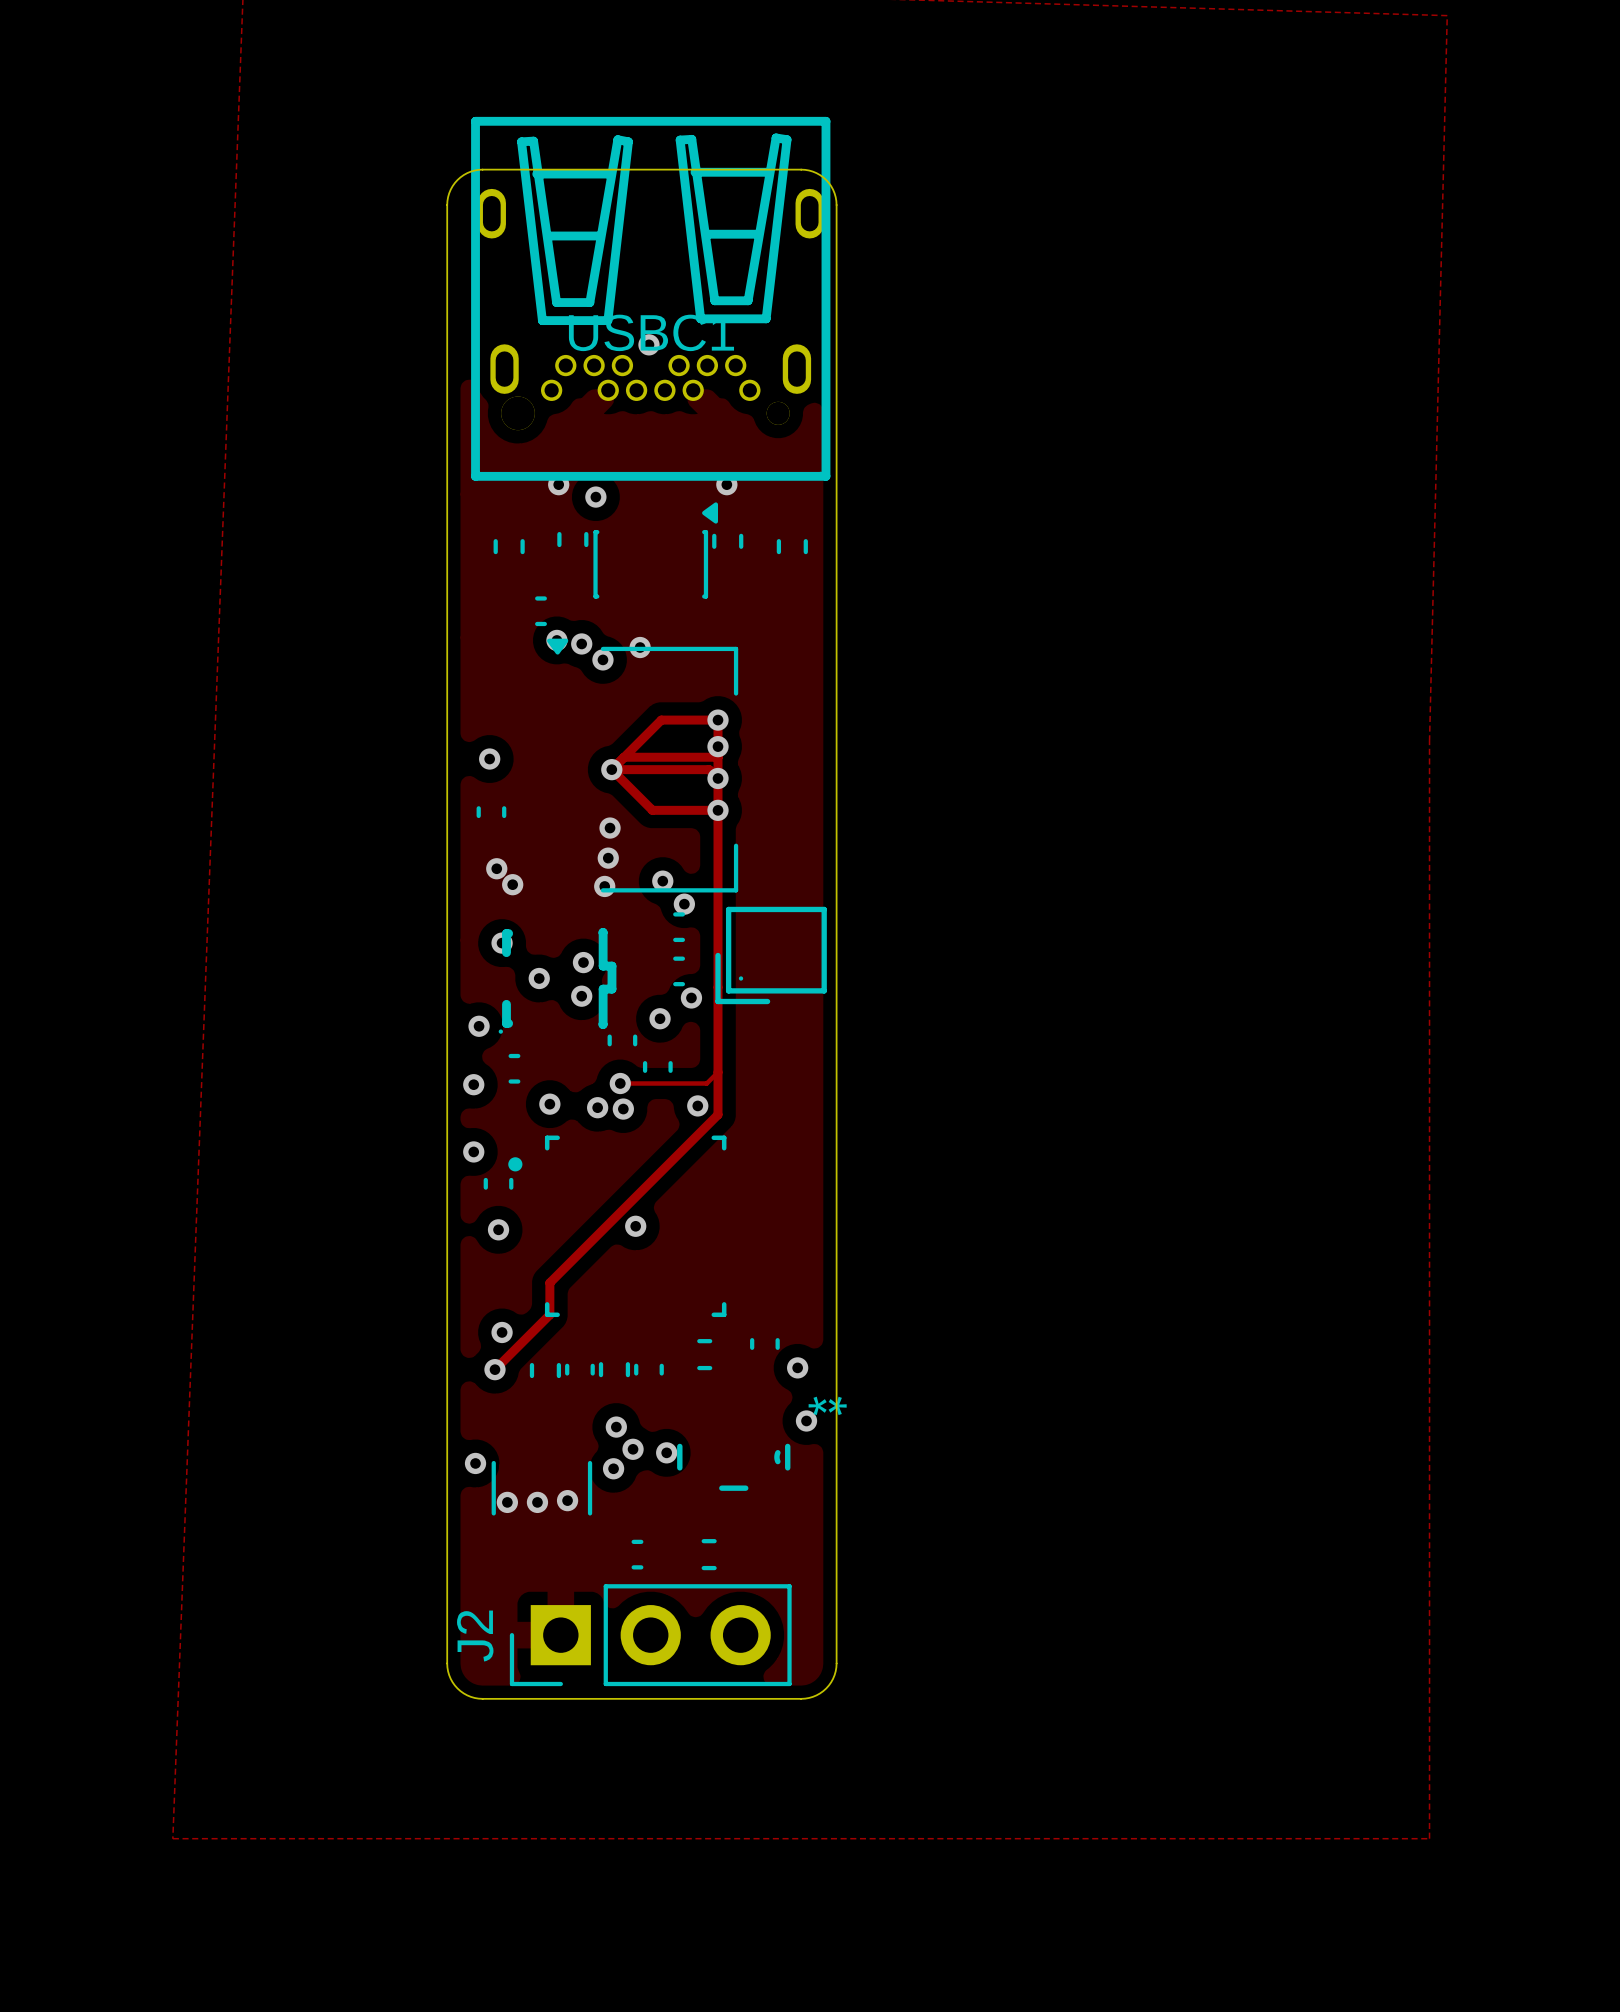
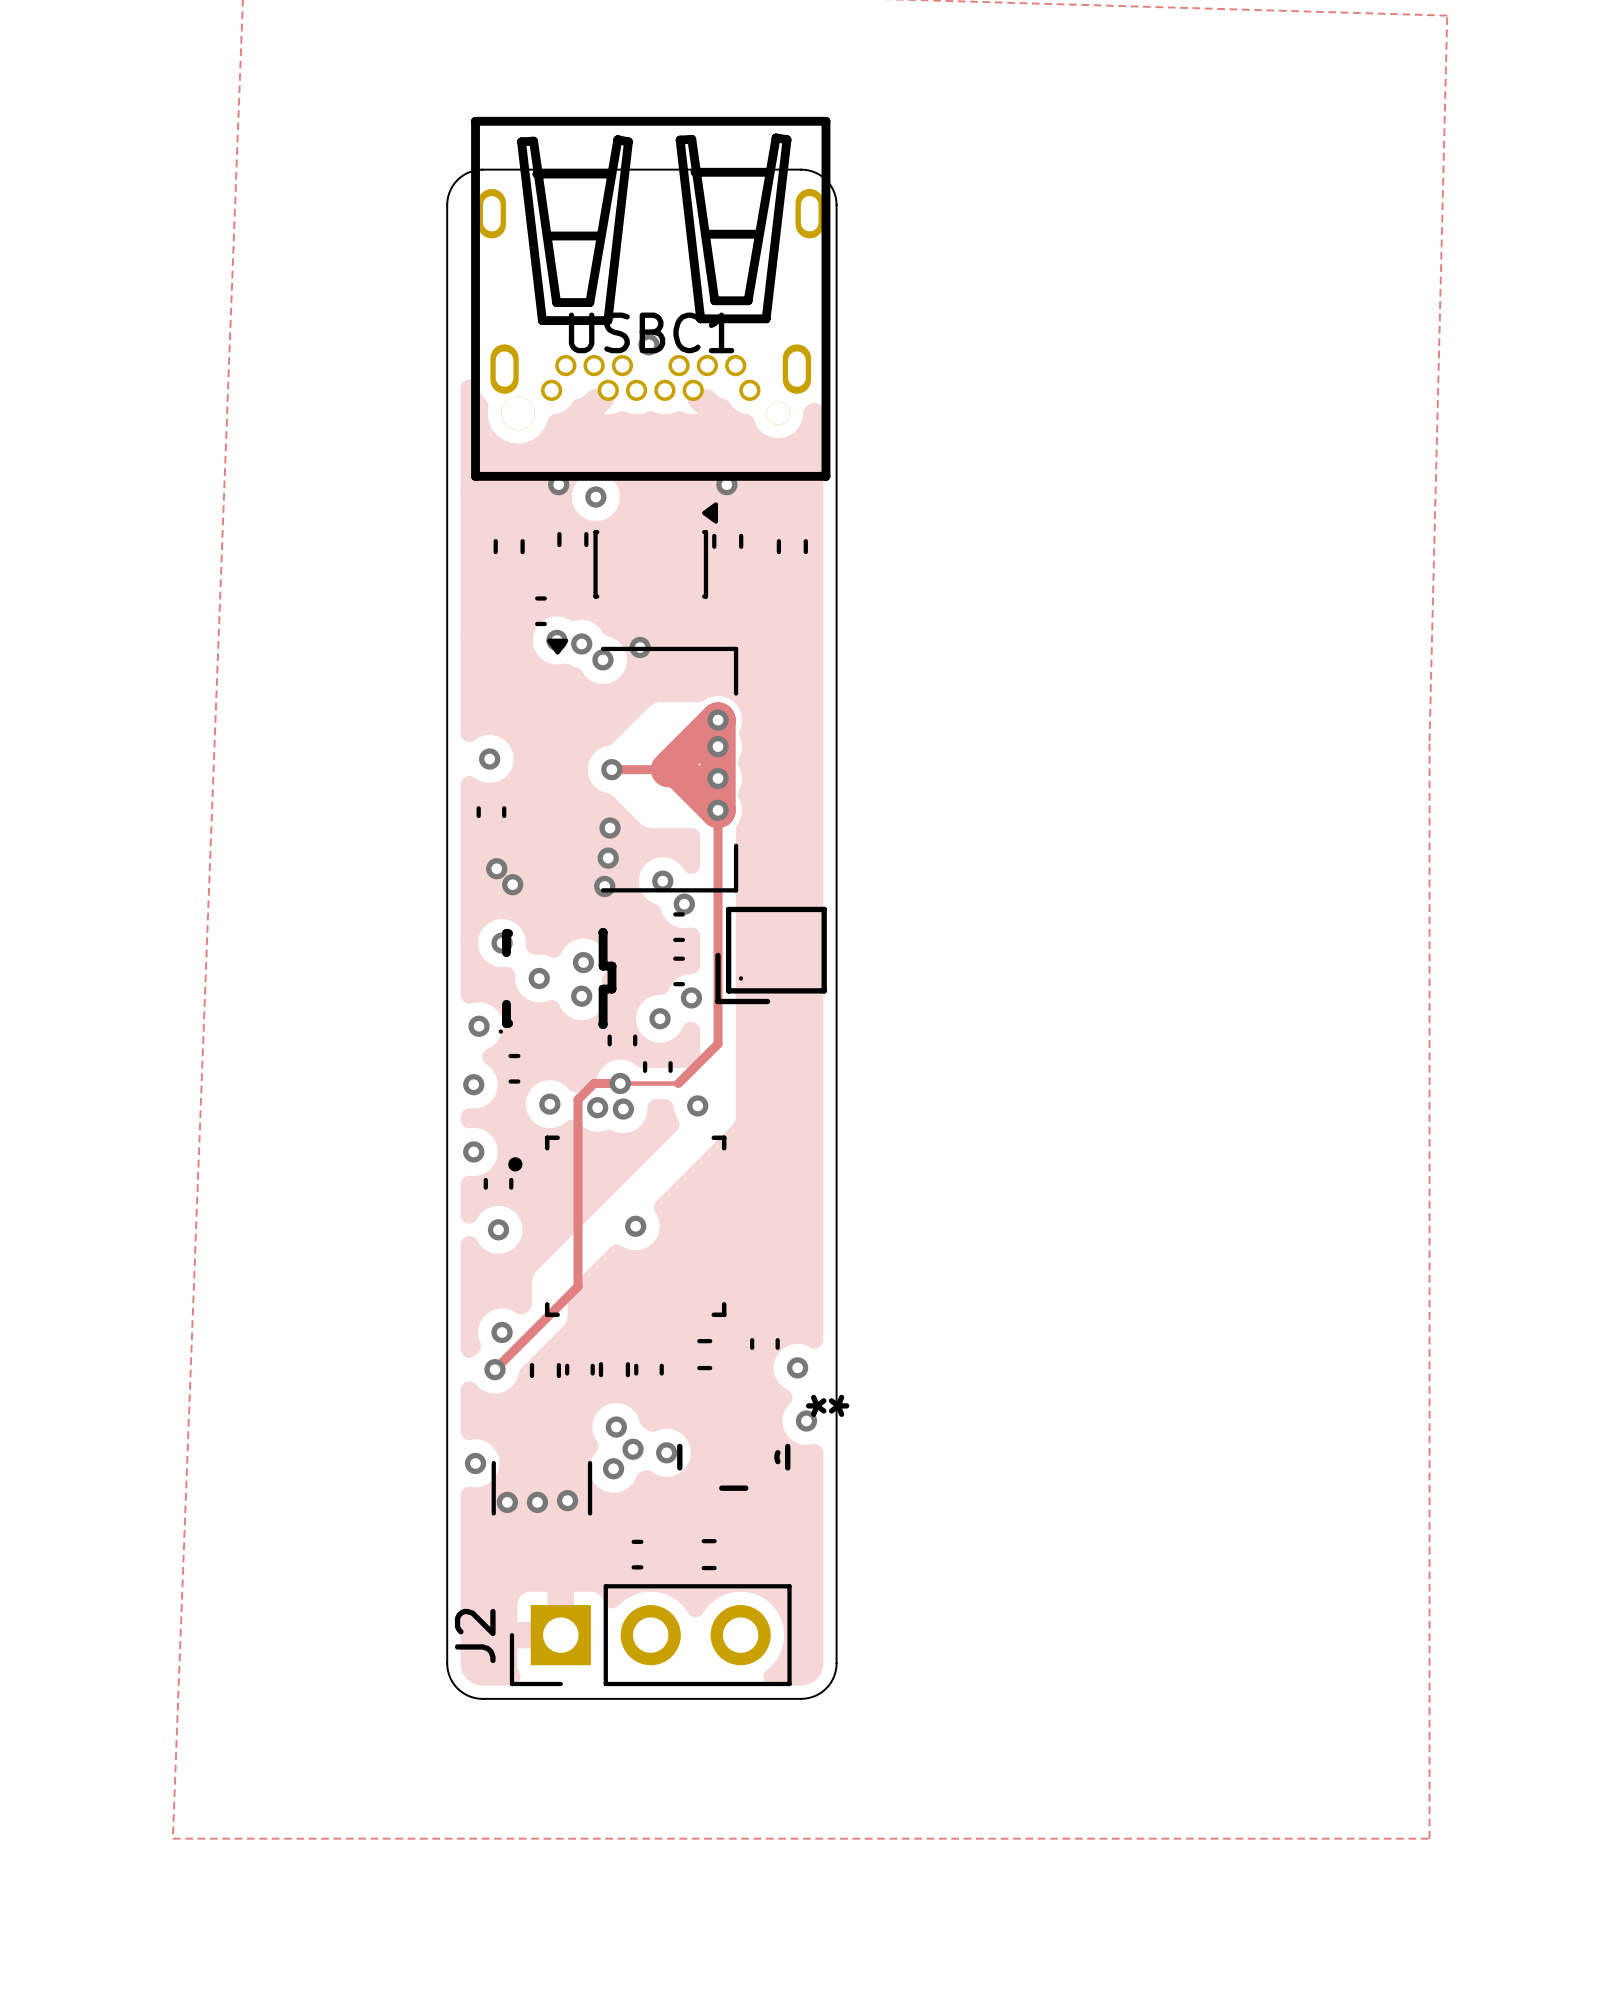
track: (718, 720) (661, 720) (611, 769) (652, 810) (718, 810) -> none
track: (624, 757) (718, 757) -> none
track: none -> (668, 769) (718, 720) (718, 810) (677, 769)
track: (718, 1043) (718, 1114) (549, 1282) (549, 1314) -> (620, 1083) (594, 1083) (578, 1099) (578, 1286) (549, 1314)
track: (718, 1072) (706, 1083) (678, 1083) -> (718, 1043) (678, 1083)

